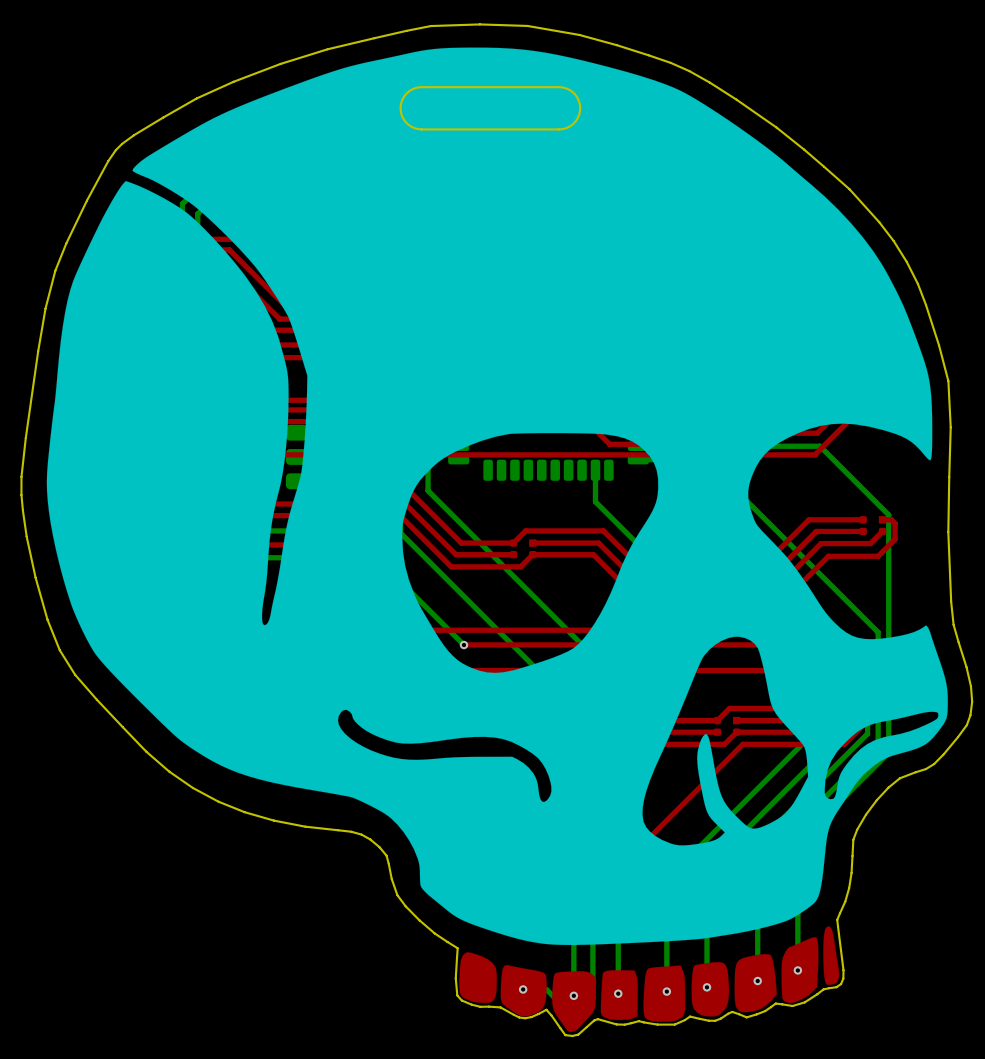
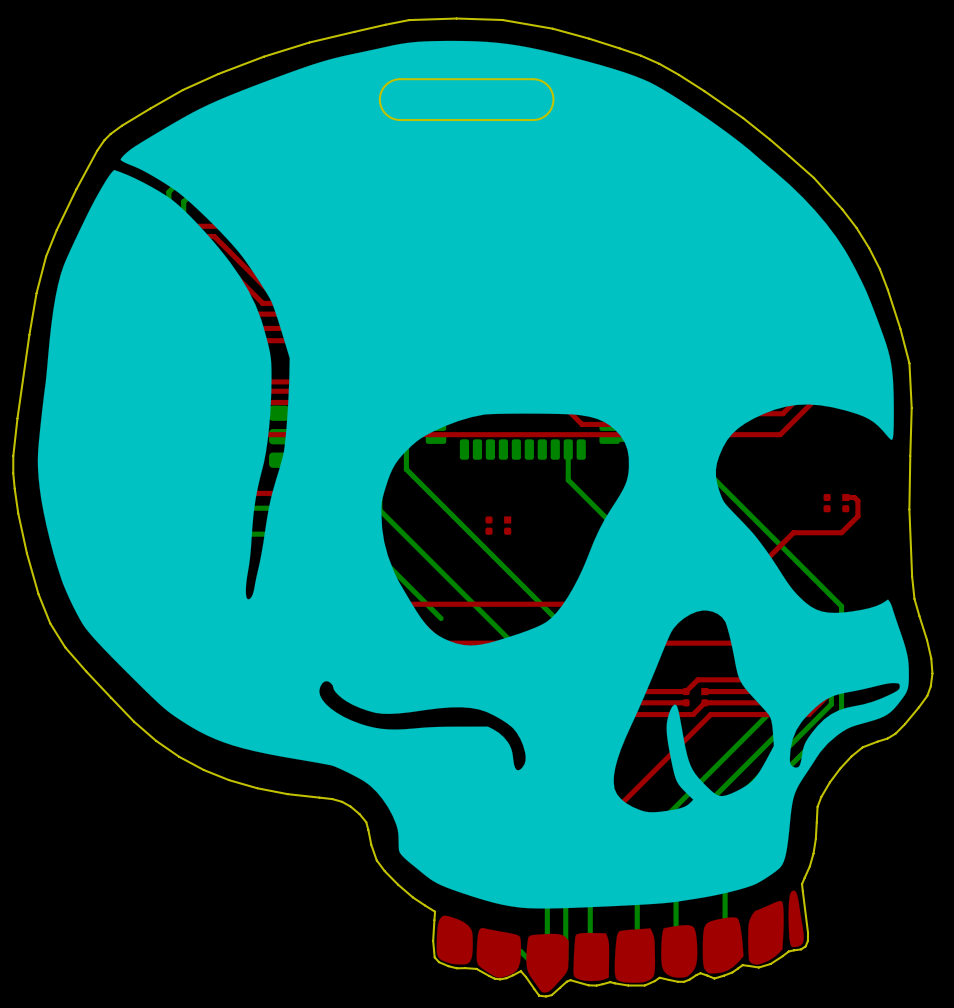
bottom track: (638, 446) (819, 446) (888, 514) (888, 752) (797, 843) (797, 970) -> none
top track: (361, 503) (405, 503) (456, 554) (513, 554) -> none
top track: (863, 519) (808, 519) (764, 564) (721, 564) (708, 576) (649, 576) (603, 530) (525, 530) (513, 543) (461, 543) (411, 492) (353, 492) (342, 503) (184, 503) (140, 547) (100, 547) (90, 557) -> none
top track: (863, 531) (816, 531) (770, 576) (728, 576) -> none
top track: (882, 531) (870, 543) (821, 543) (776, 588) (728, 588) (716, 600) (639, 600) (593, 554) (532, 554) (520, 566) (451, 566) (400, 515) (361, 515) (332, 544) (213, 544) (200, 557) (160, 557) (148, 569) (110, 569) -> none
top track: (532, 543) (598, 543) (644, 588) (708, 588) -> none
top track: (464, 644) (816, 644) (828, 657) -> none
via: (463, 645) -> none
via: (797, 970) -> none
via: (757, 981) -> none
via: (706, 987) -> none
via: (523, 989) -> none
via: (666, 991) -> none
via: (618, 993) -> none
via: (573, 995) -> none

